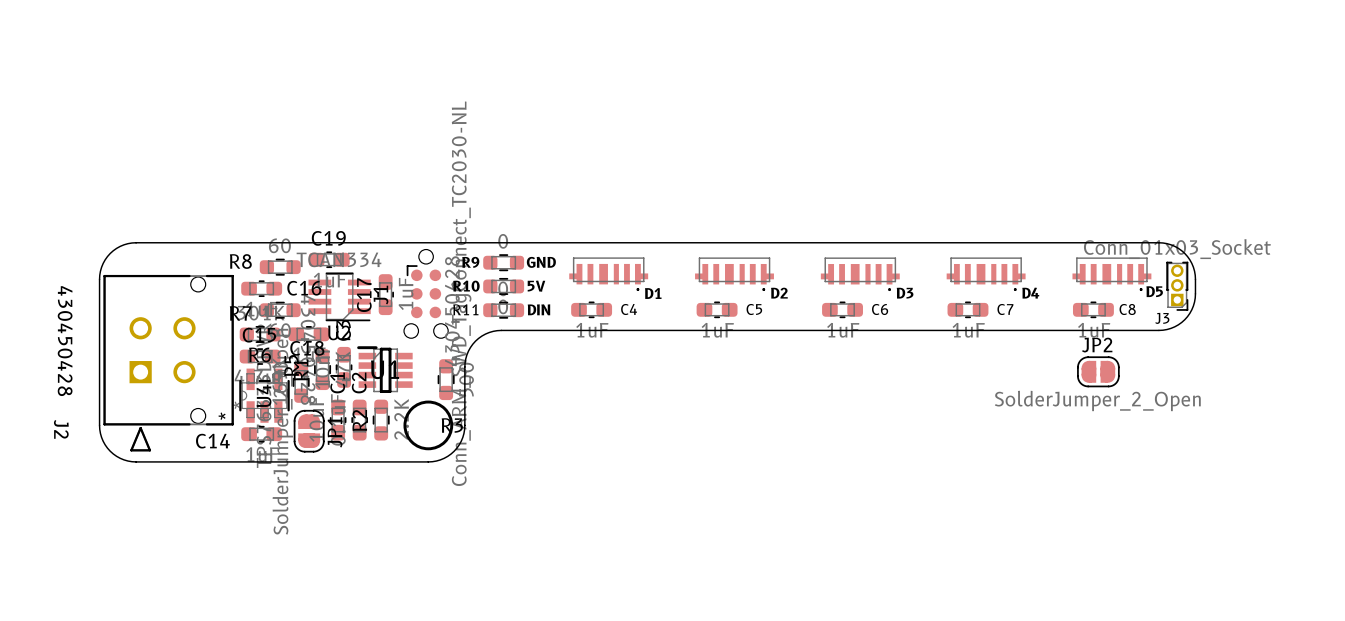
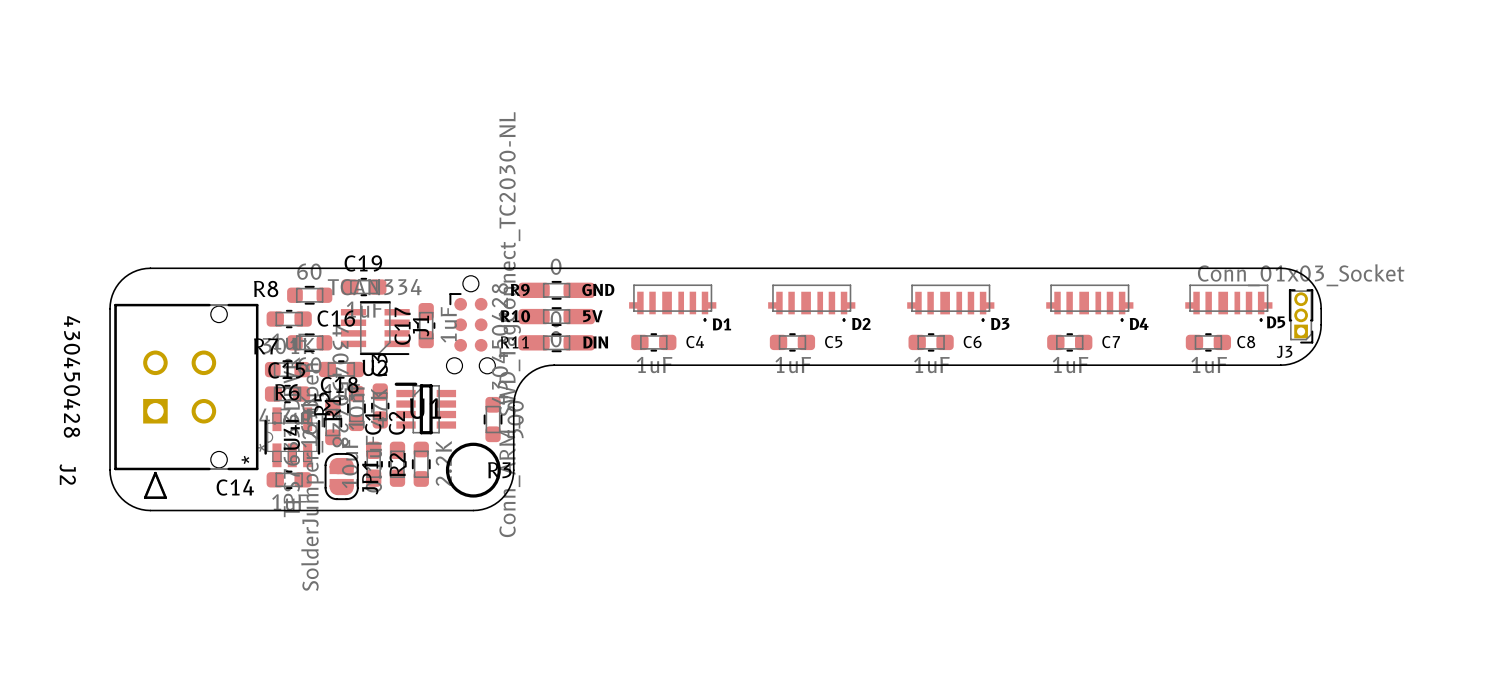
R9 footprint: [483, 254, 525, 272] -> [518, 280, 595, 300]
R10 footprint: [483, 277, 525, 295] -> [518, 307, 595, 326]
R11 footprint: [483, 301, 525, 319] -> [518, 333, 595, 353]
JP2: SolderJumper_2_Open (1098, 371) -> none

